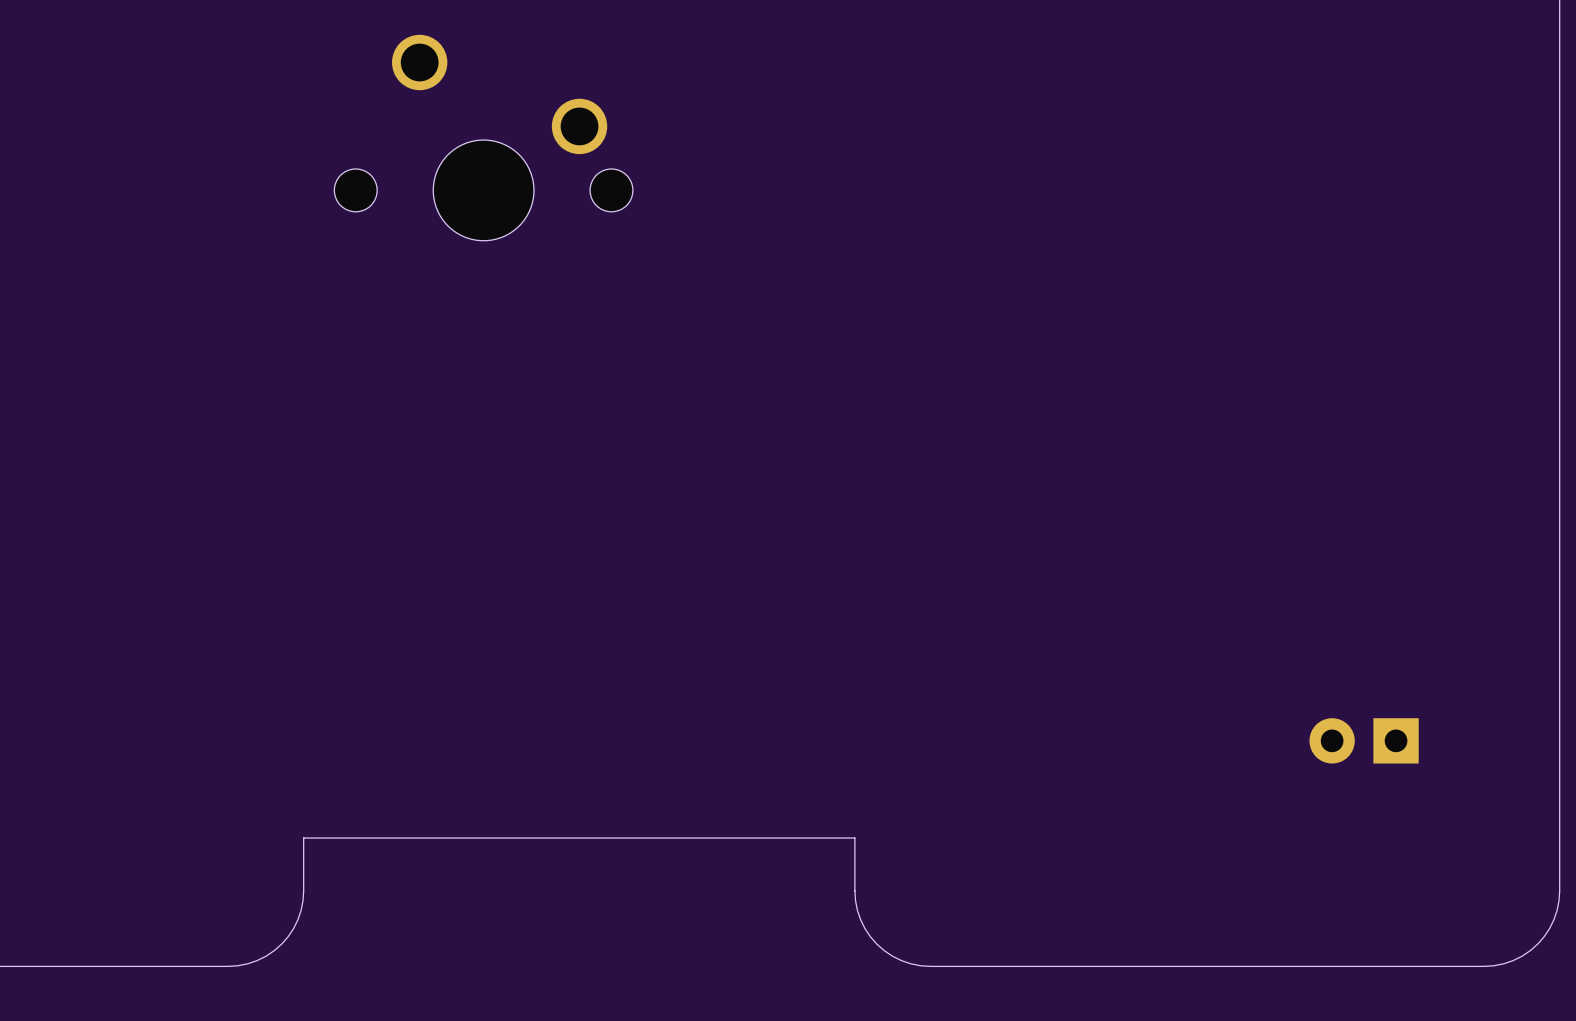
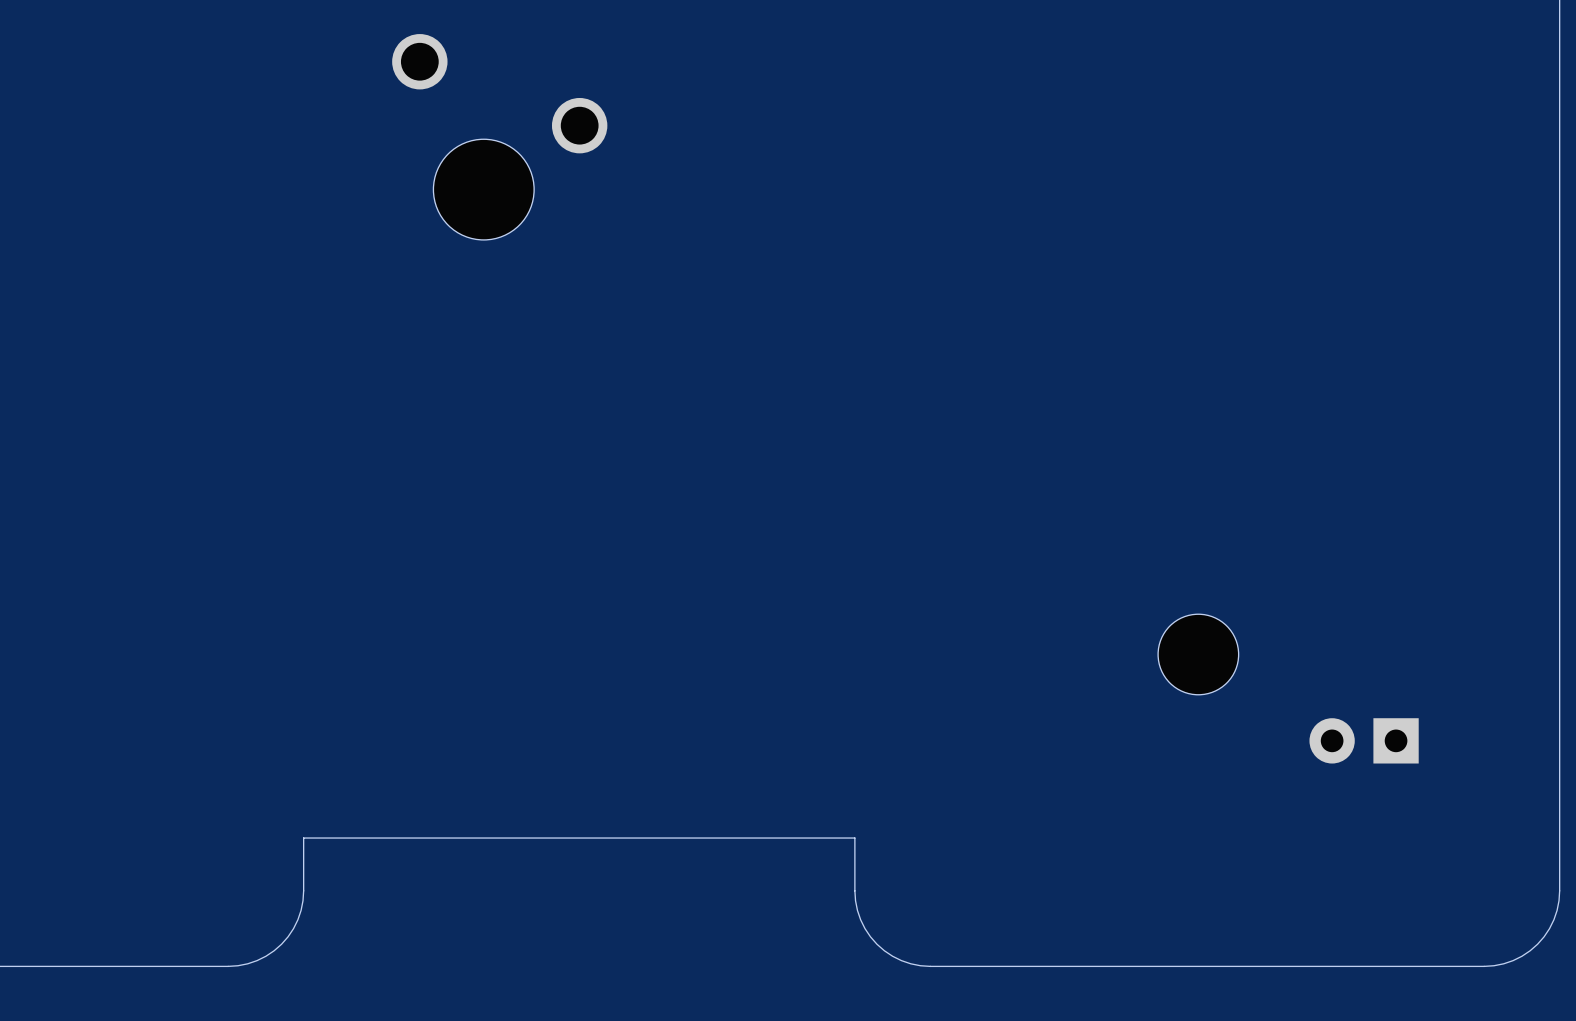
part footprint: [334, 34, 633, 241] -> [392, 34, 608, 240]
part: none -> (1198, 654)

